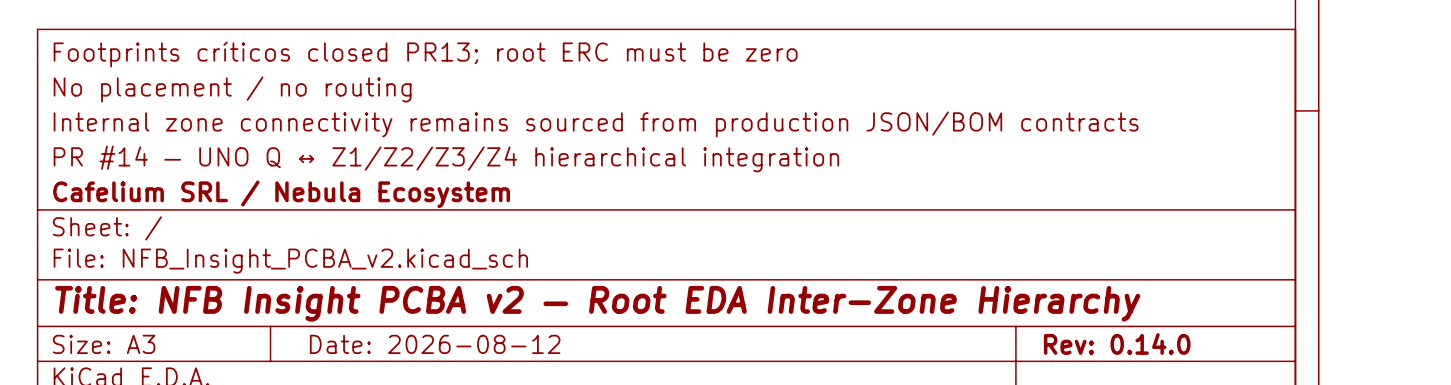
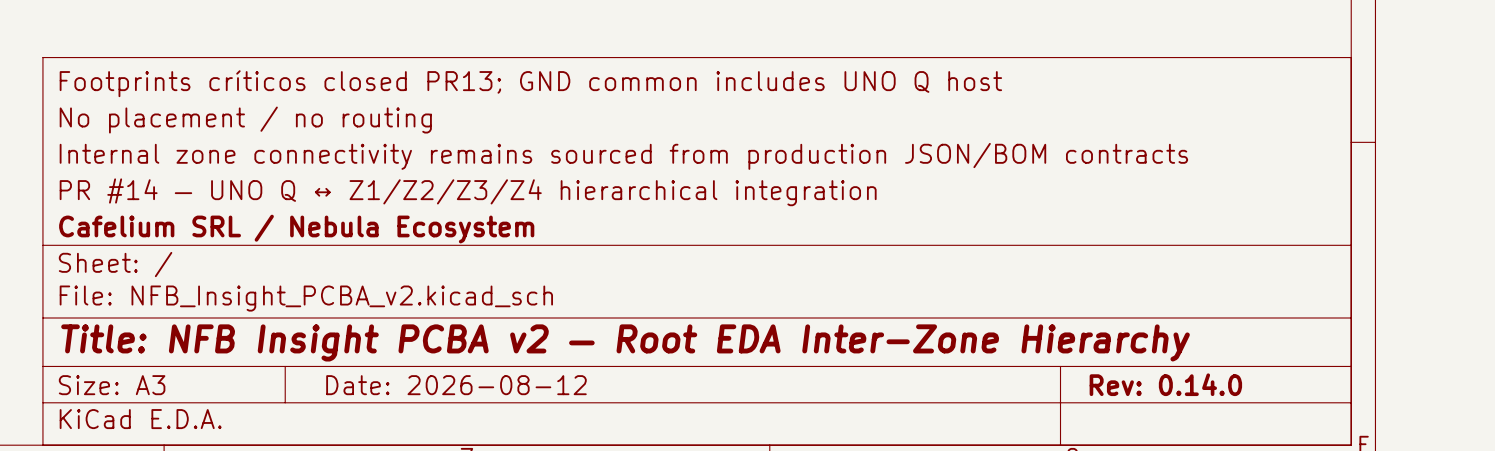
title block: Footprints críticos closed PR13; root ERC must be zero (425, 54) -> Footprints críticos closed PR13; GND common includes UNO Q host (530, 83)

